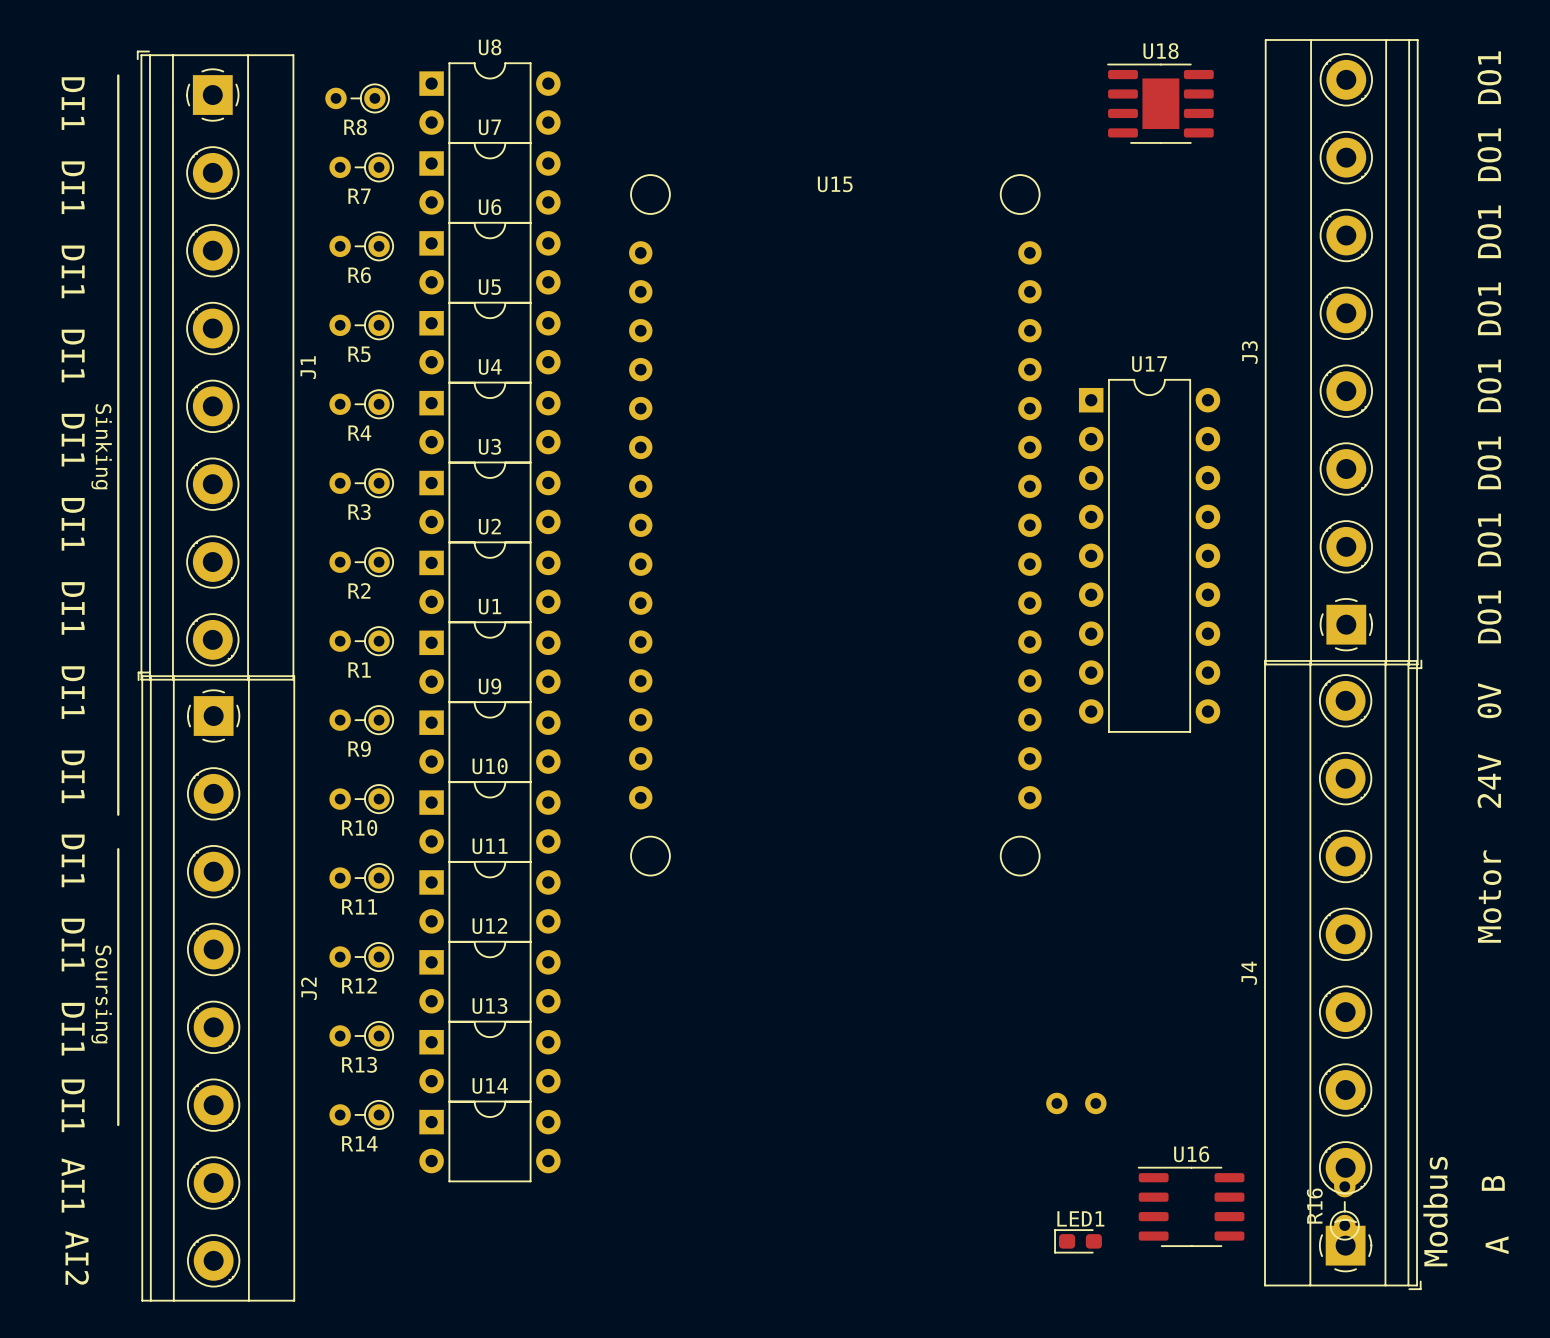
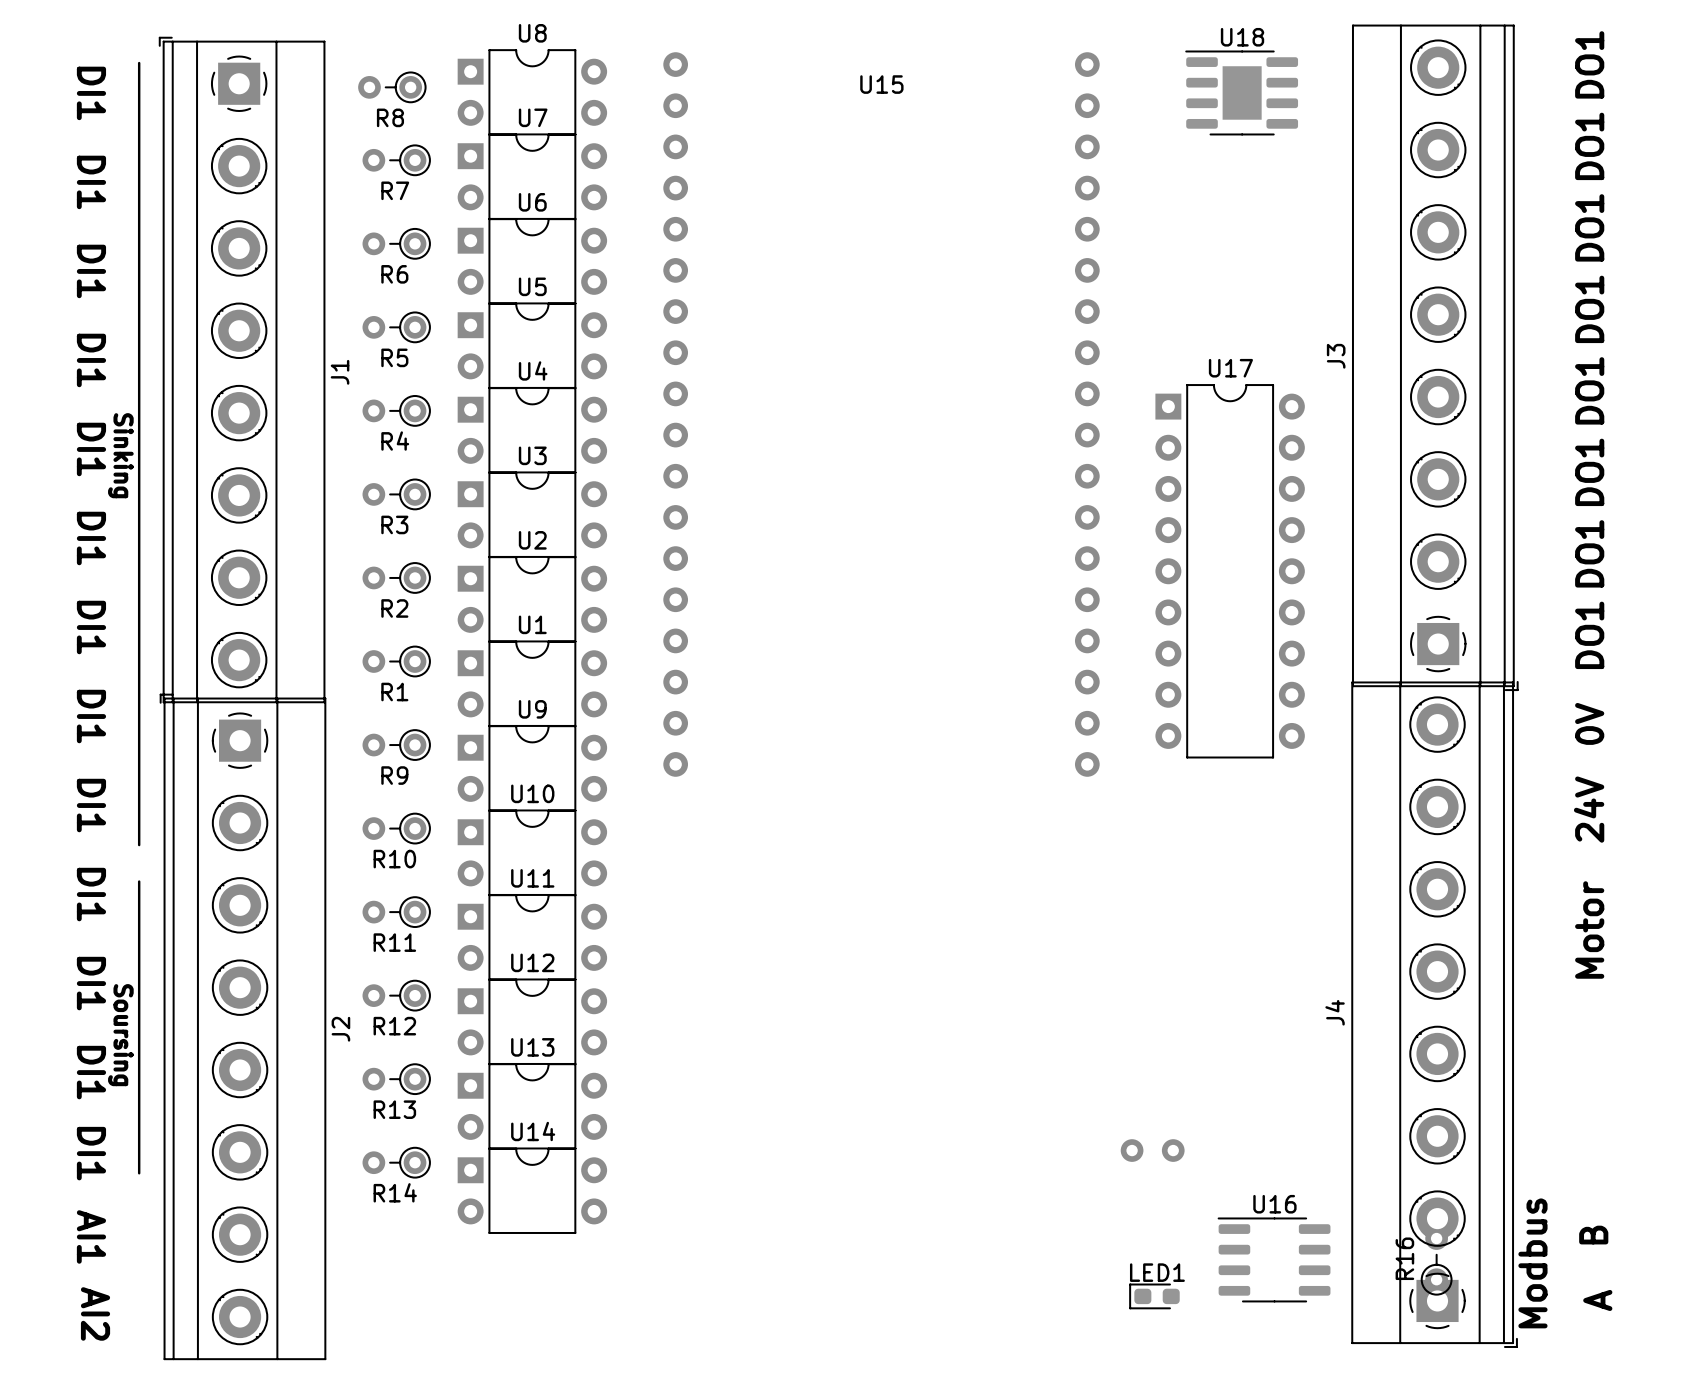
U15 footprint: [629, 174, 1042, 877] -> [663, 52, 1100, 777]

